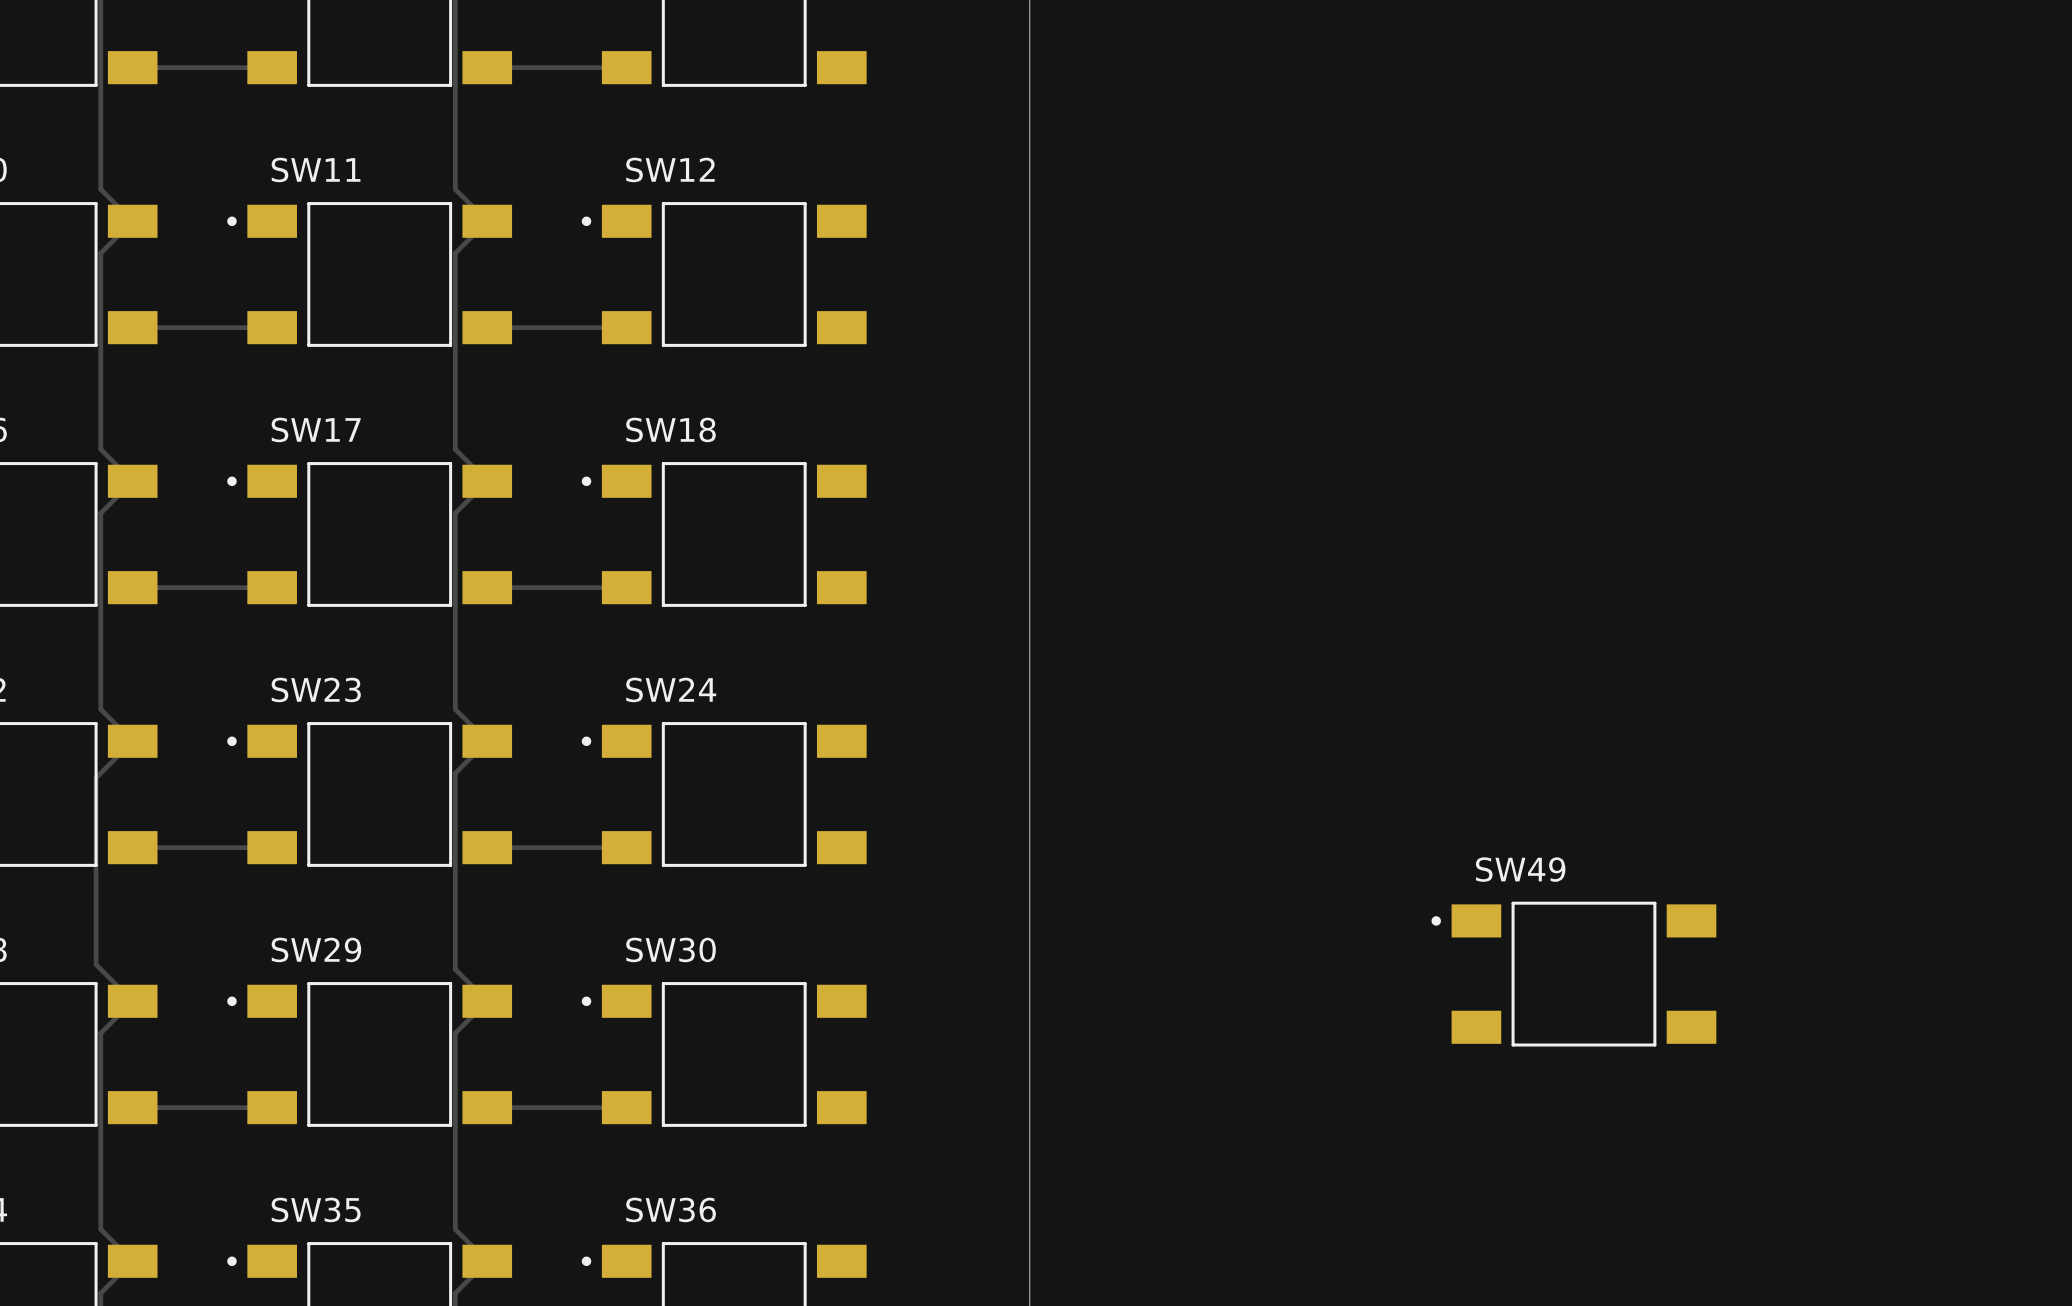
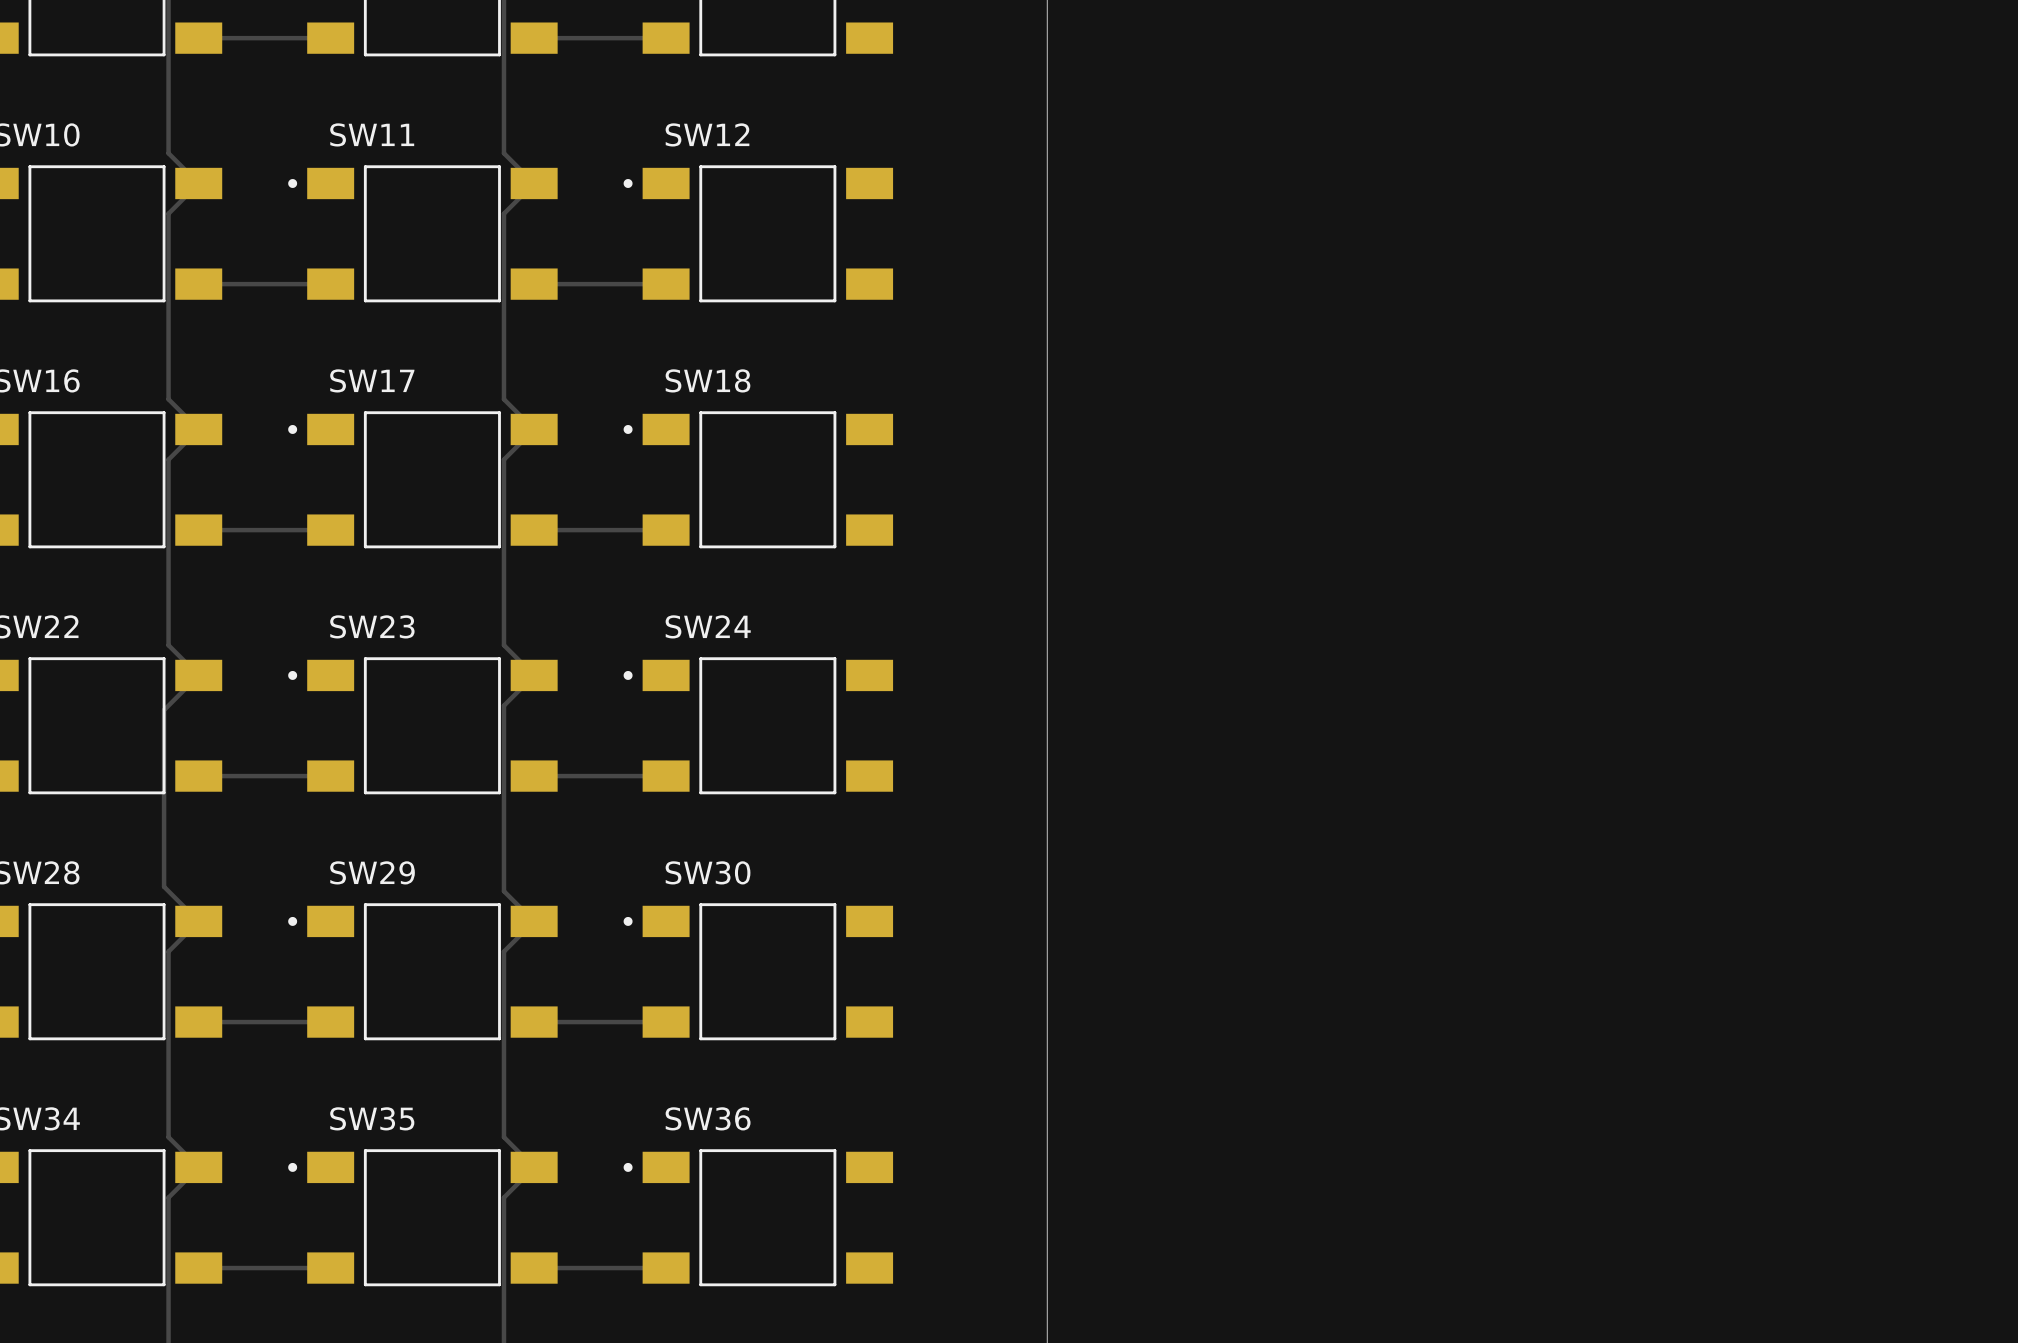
SW49: (1573, 974) -> none

